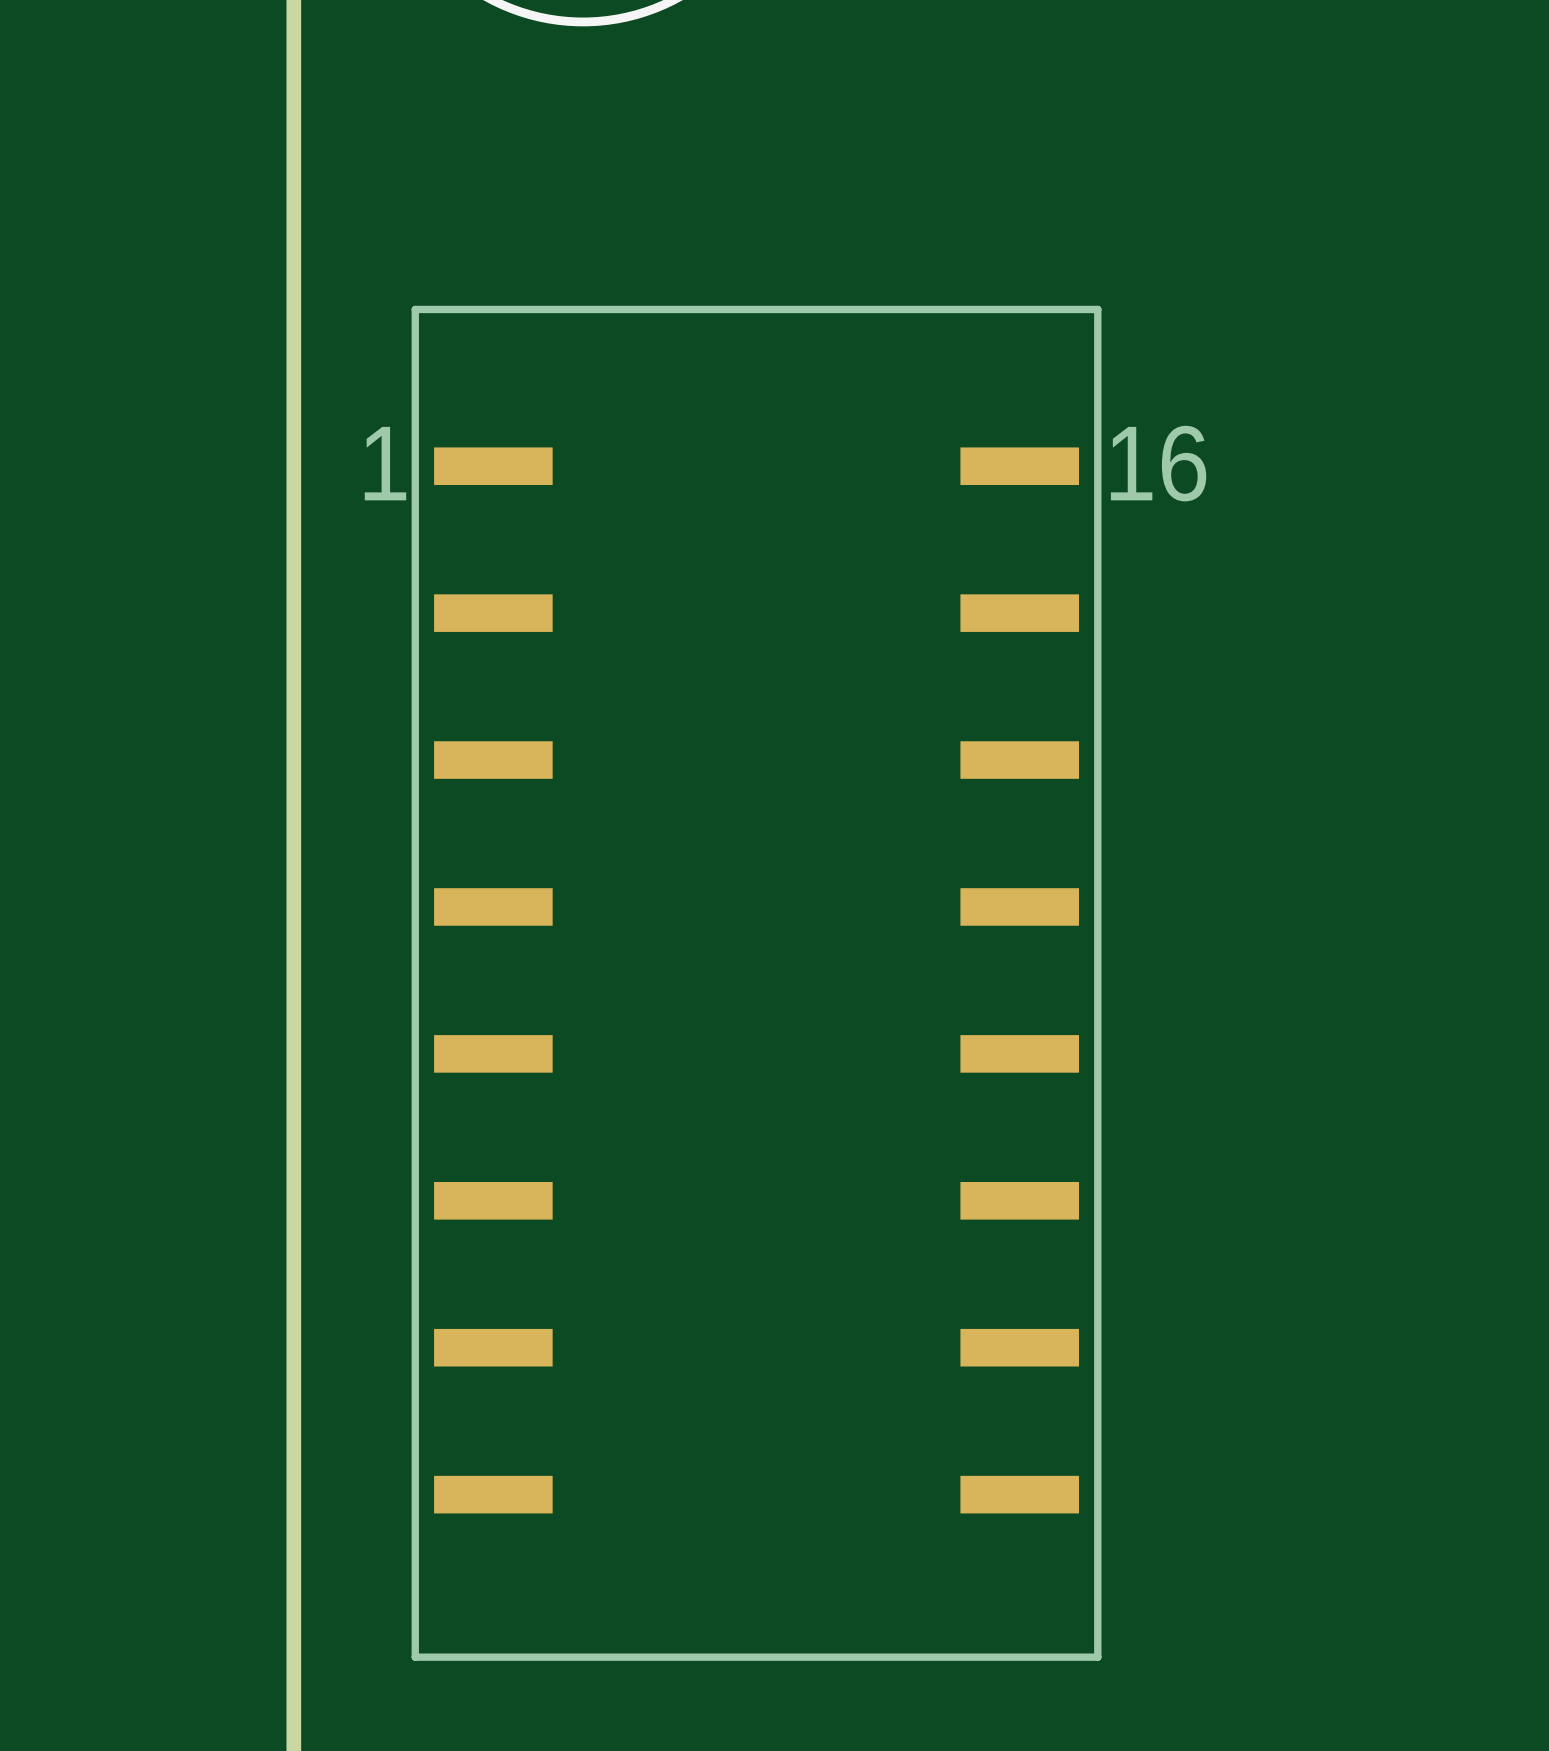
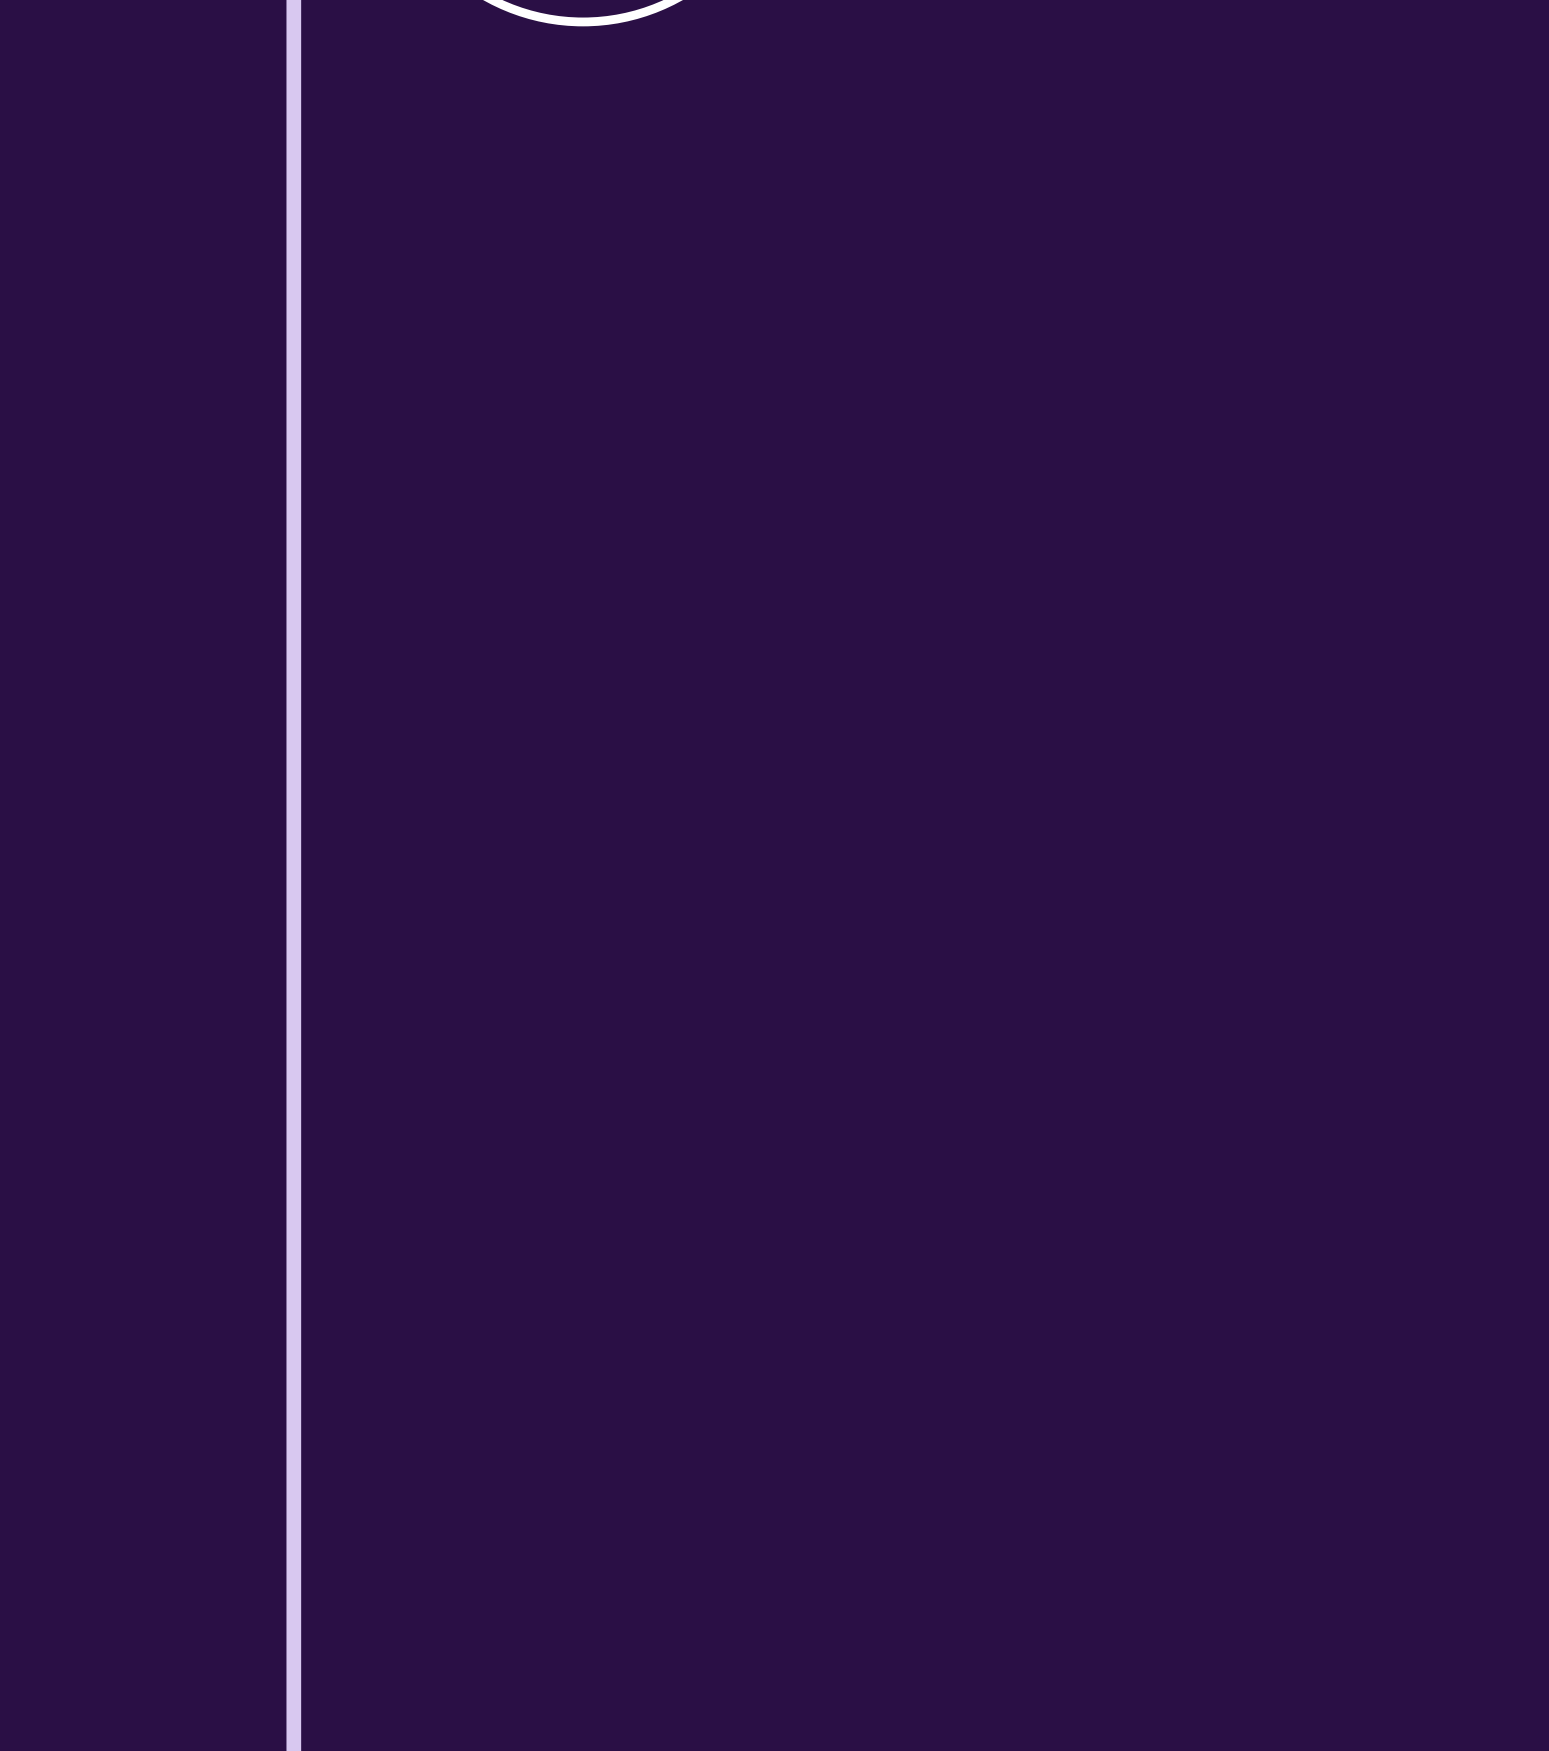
part: (756, 983) -> none

